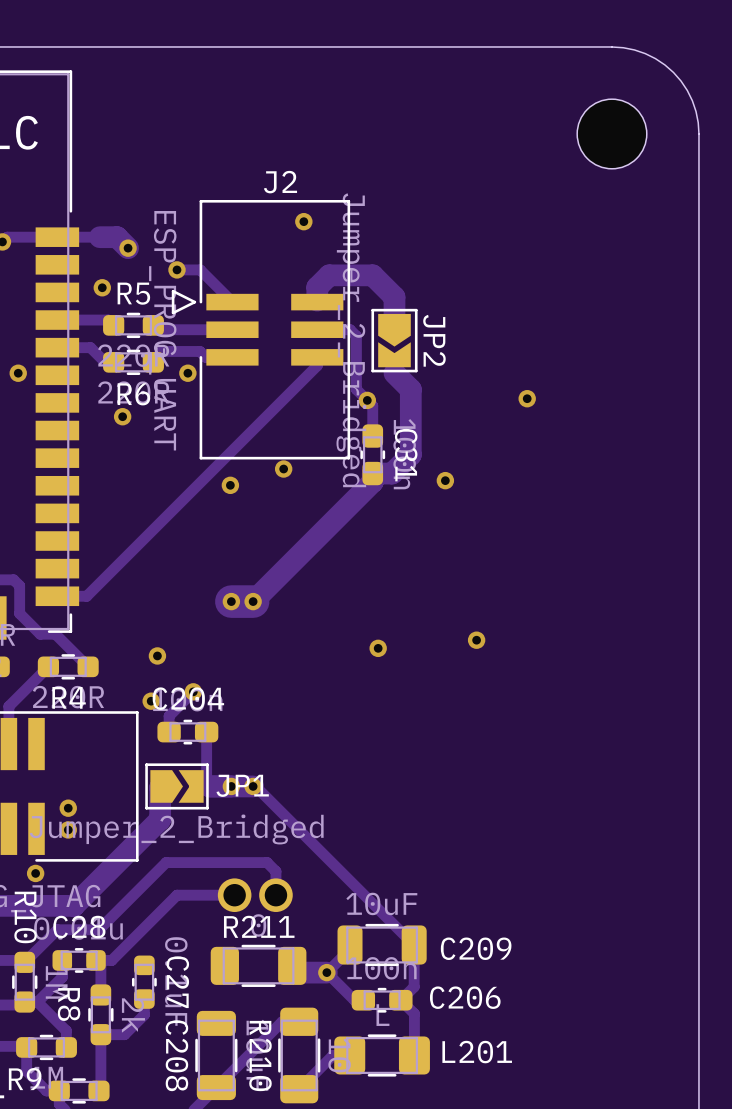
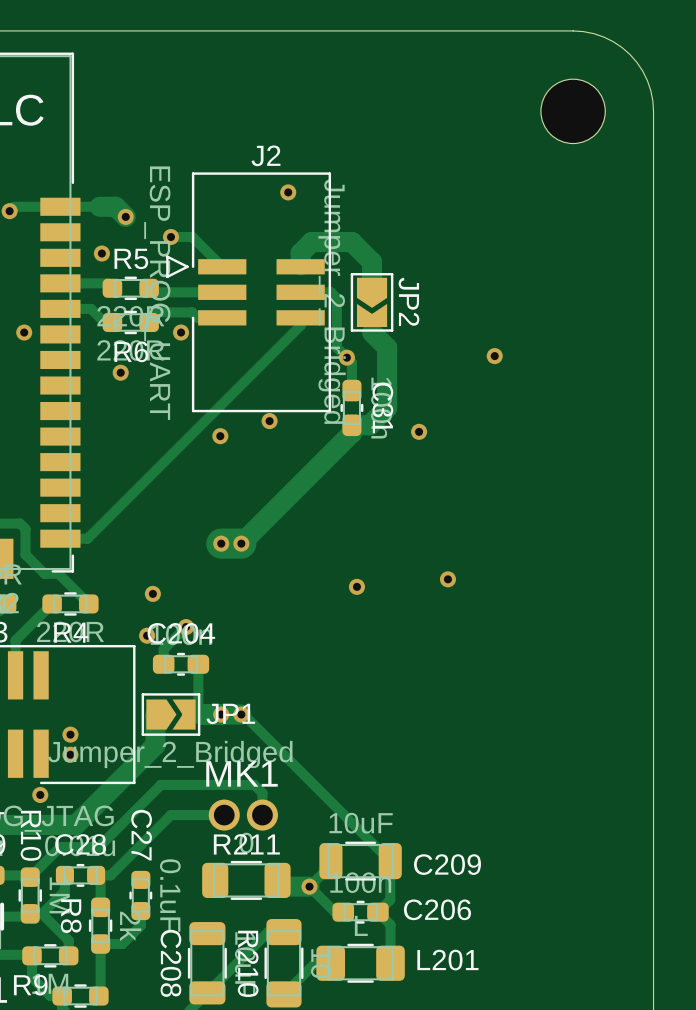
MK1 name: none -> MK1 (241, 773)
C27 name position: C27 (177, 982) -> C27 (141, 835)

